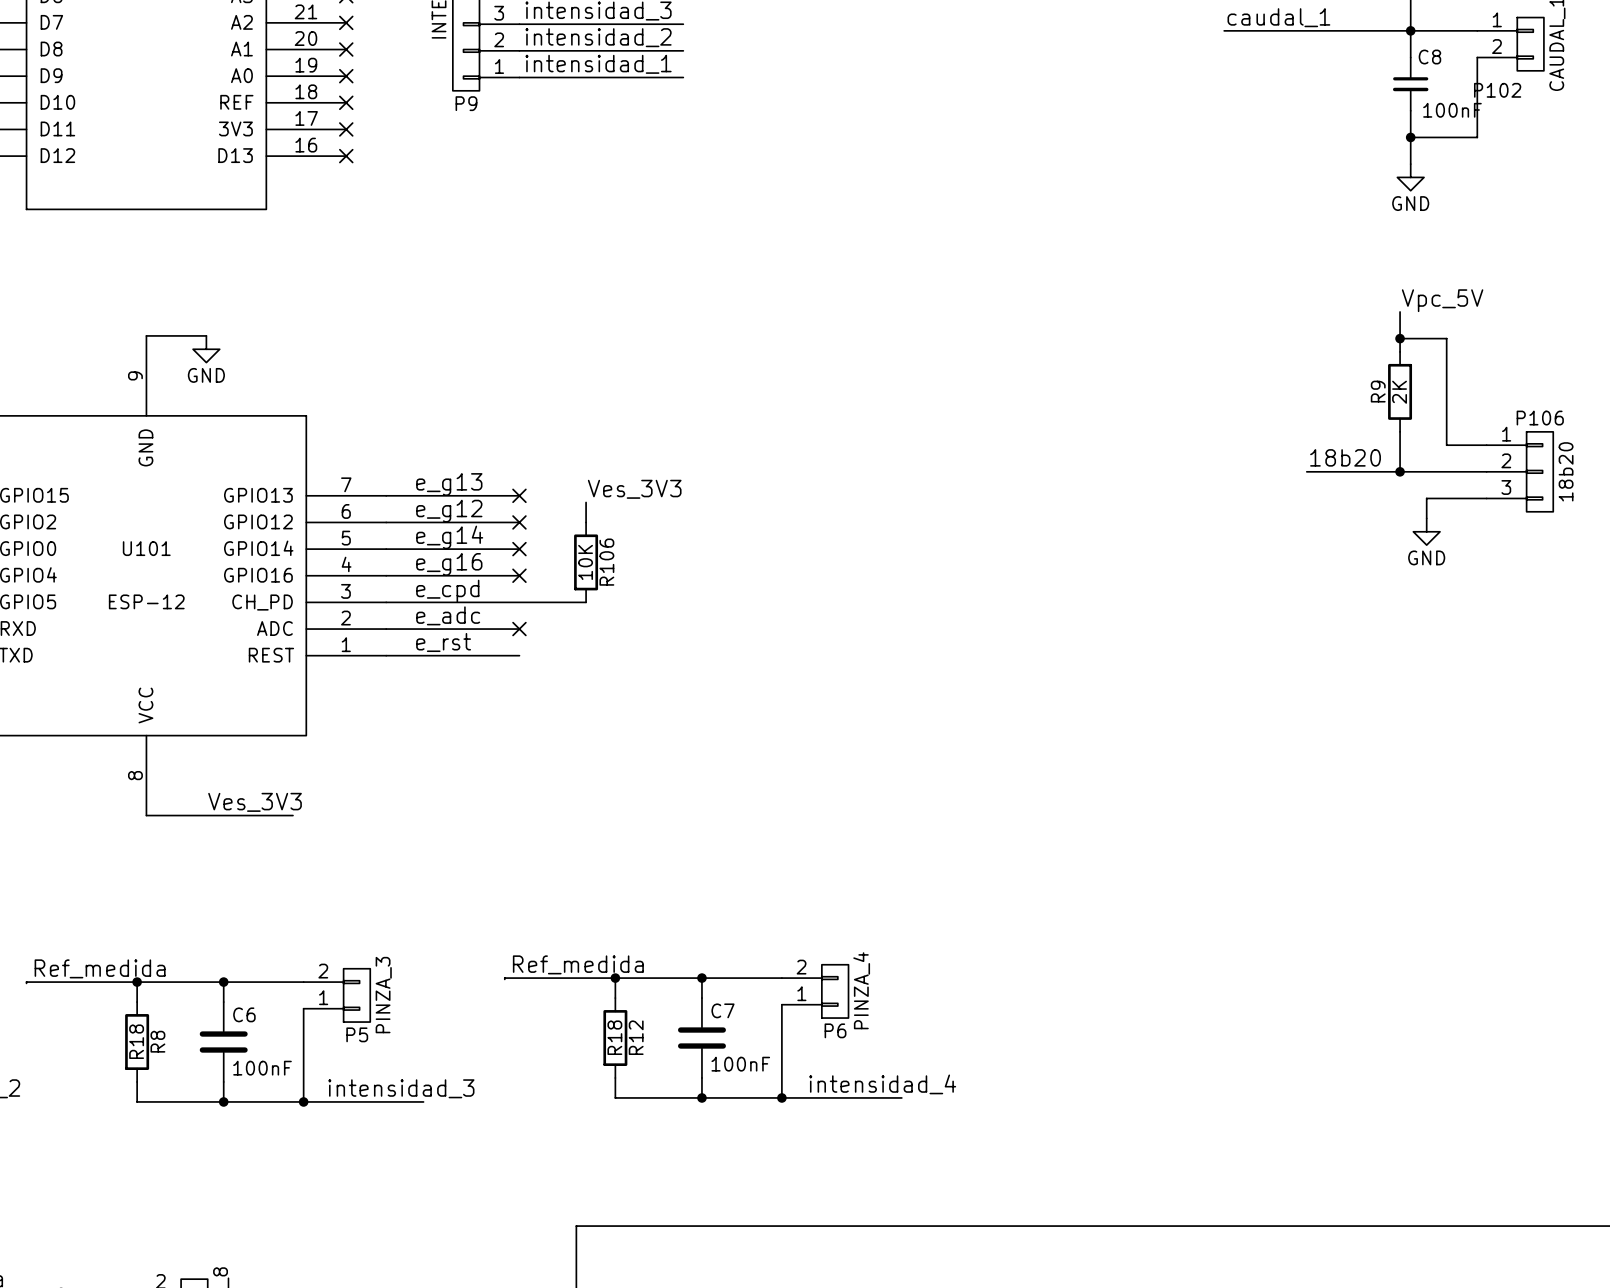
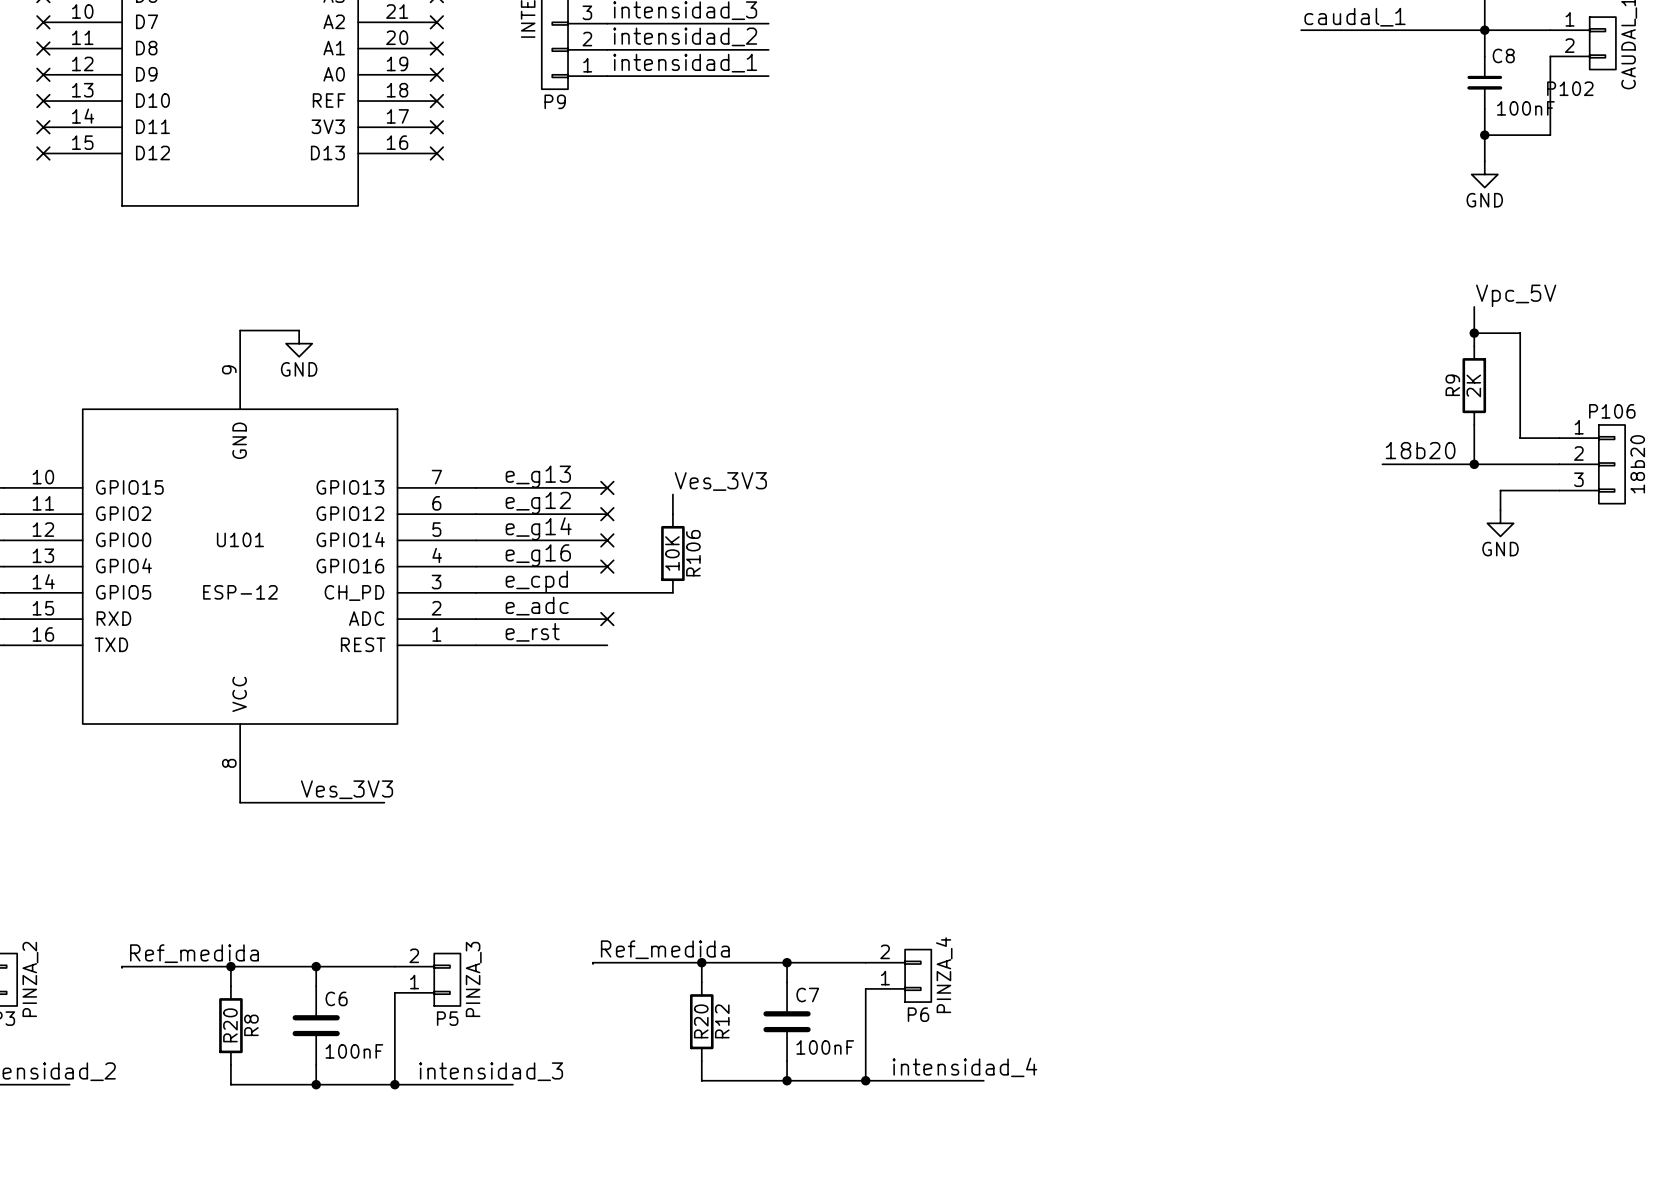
R12 value: R18 (614, 1037) -> R20 (701, 1021)
R8 value: R18 (136, 1041) -> R20 (230, 1025)

